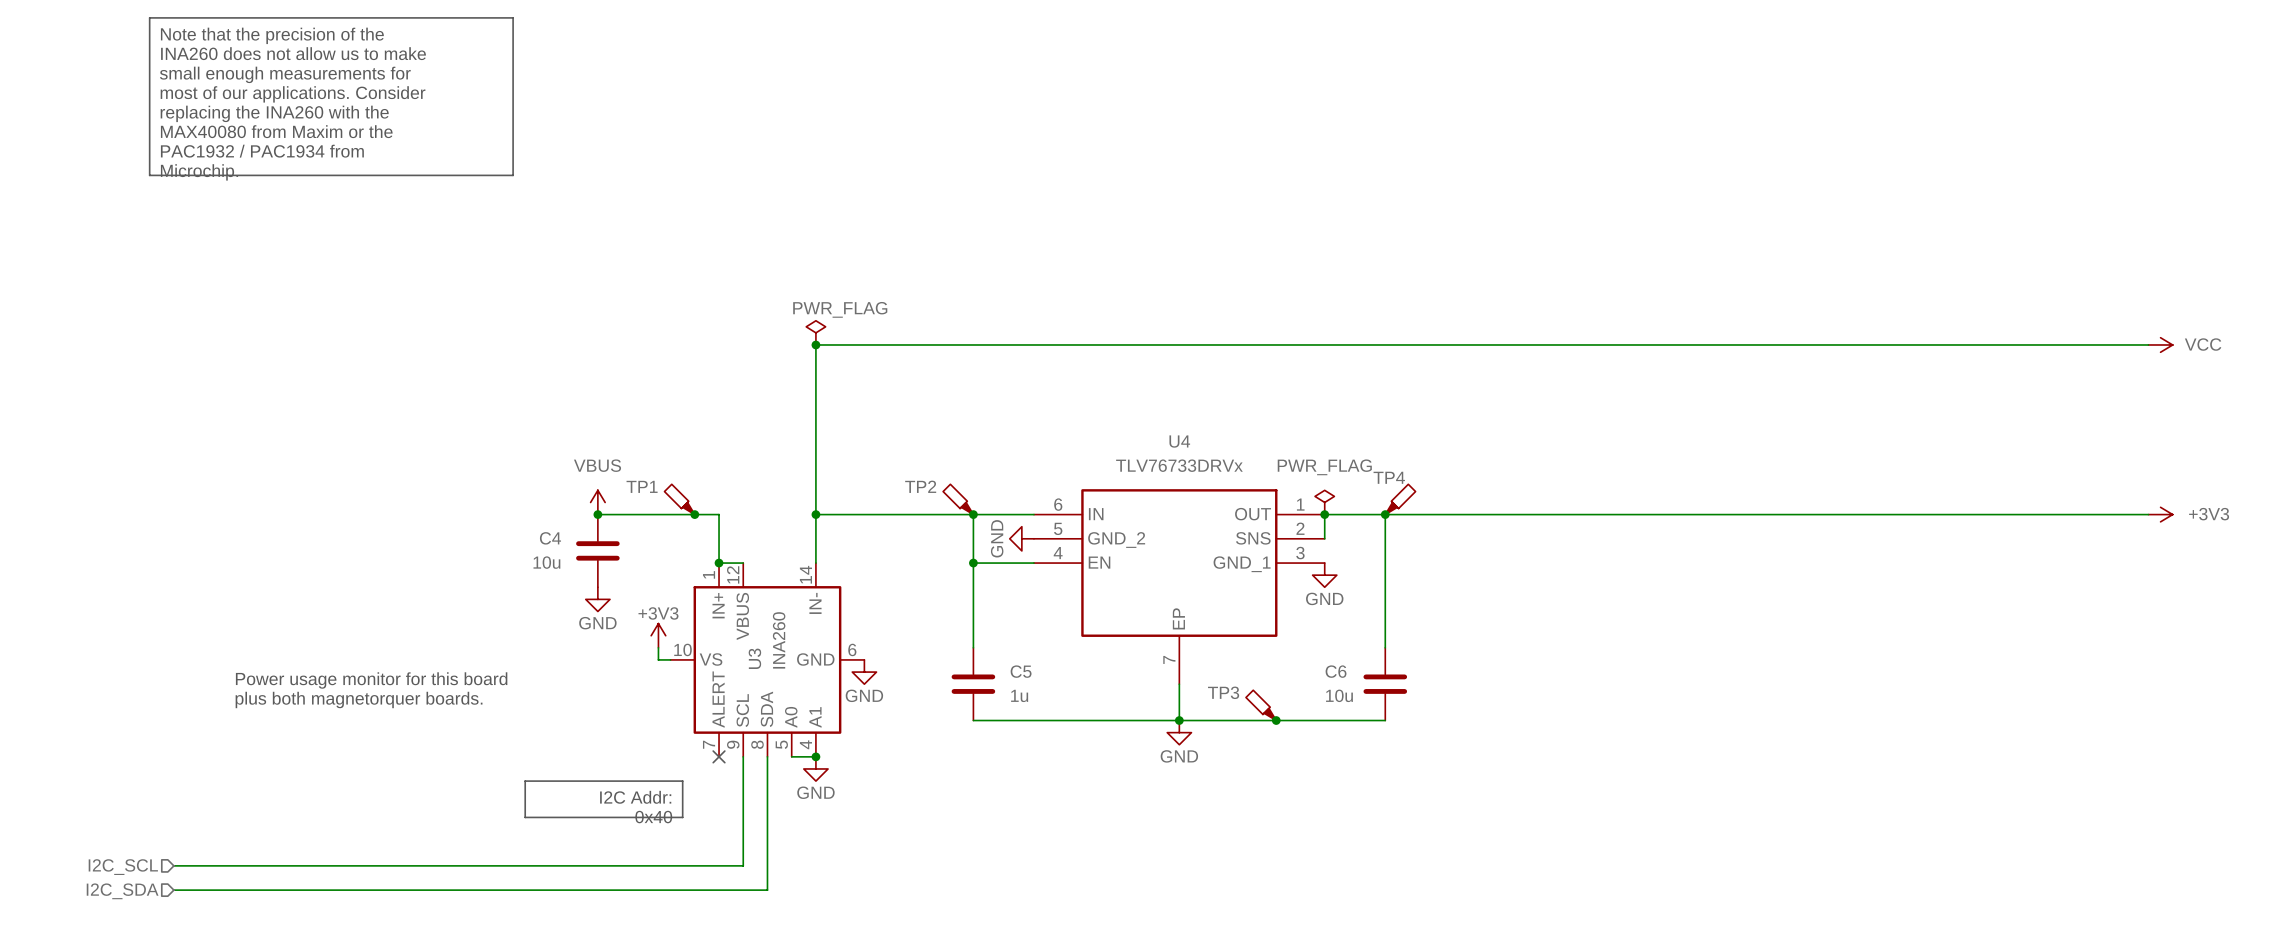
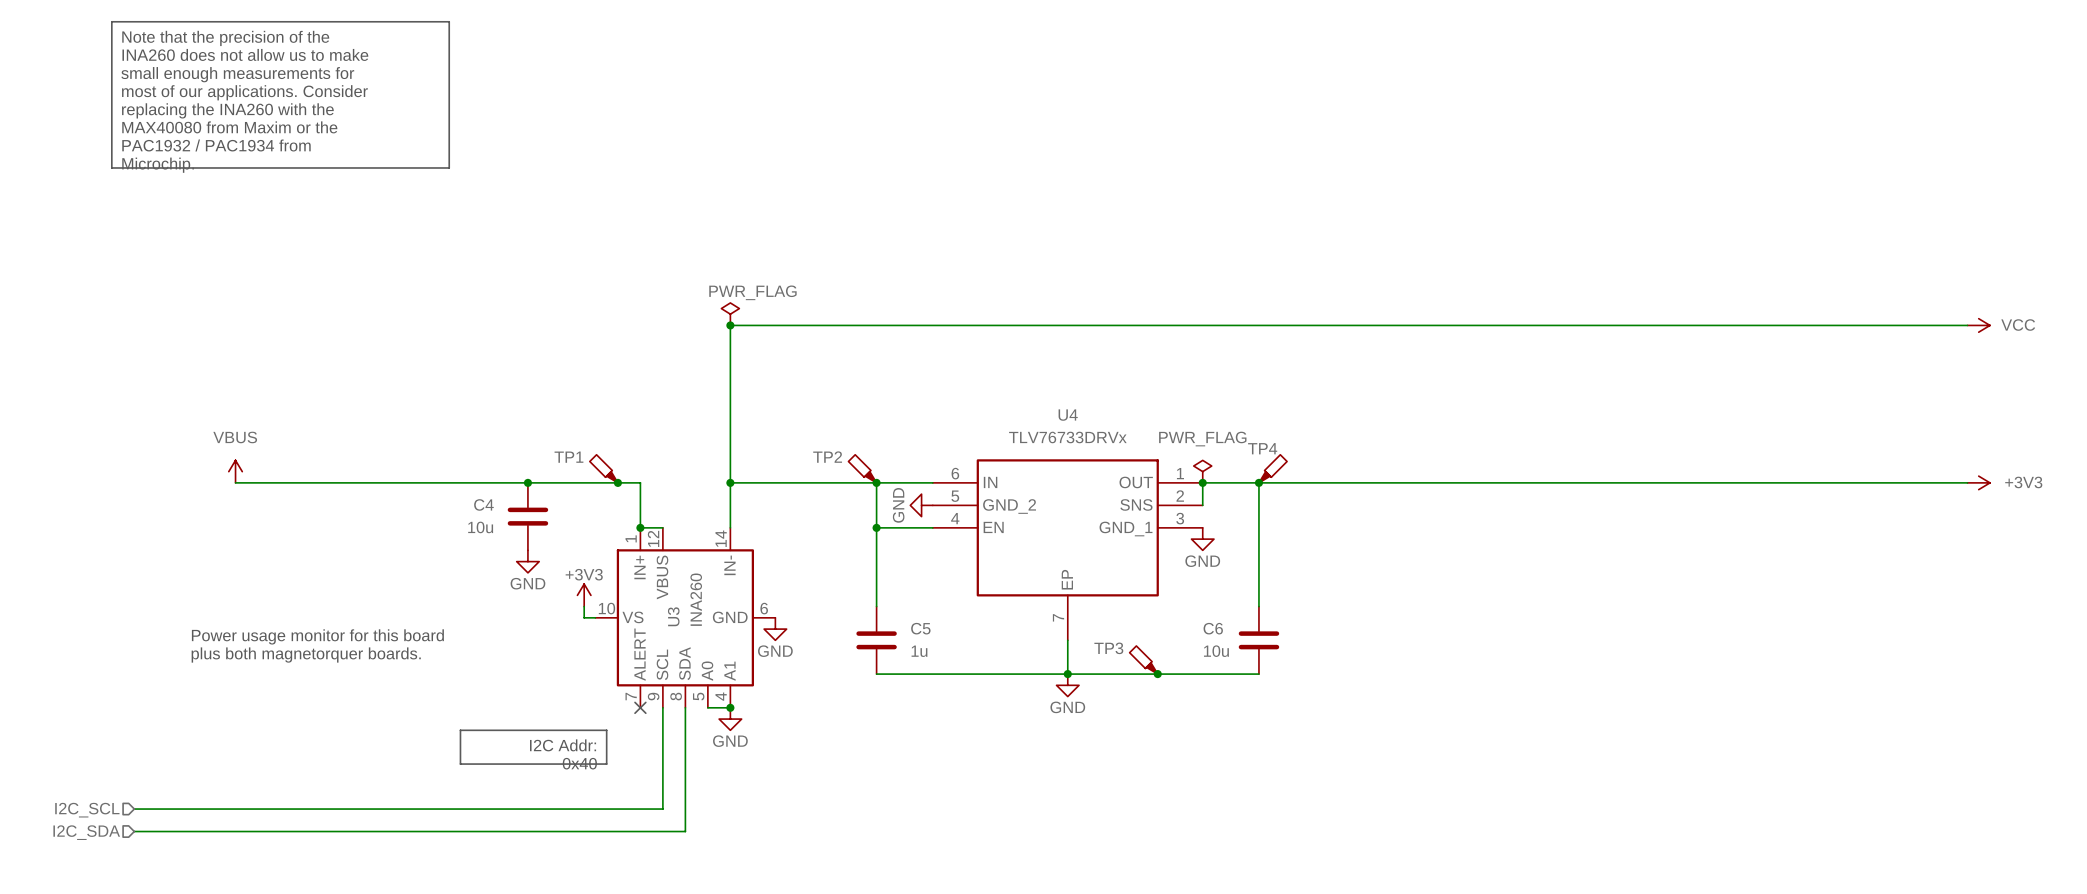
power symbol: none -> VBUS (235, 471)
power symbol: VBUS (597, 502) -> none
wire: none -> (235, 482) (527, 482)

